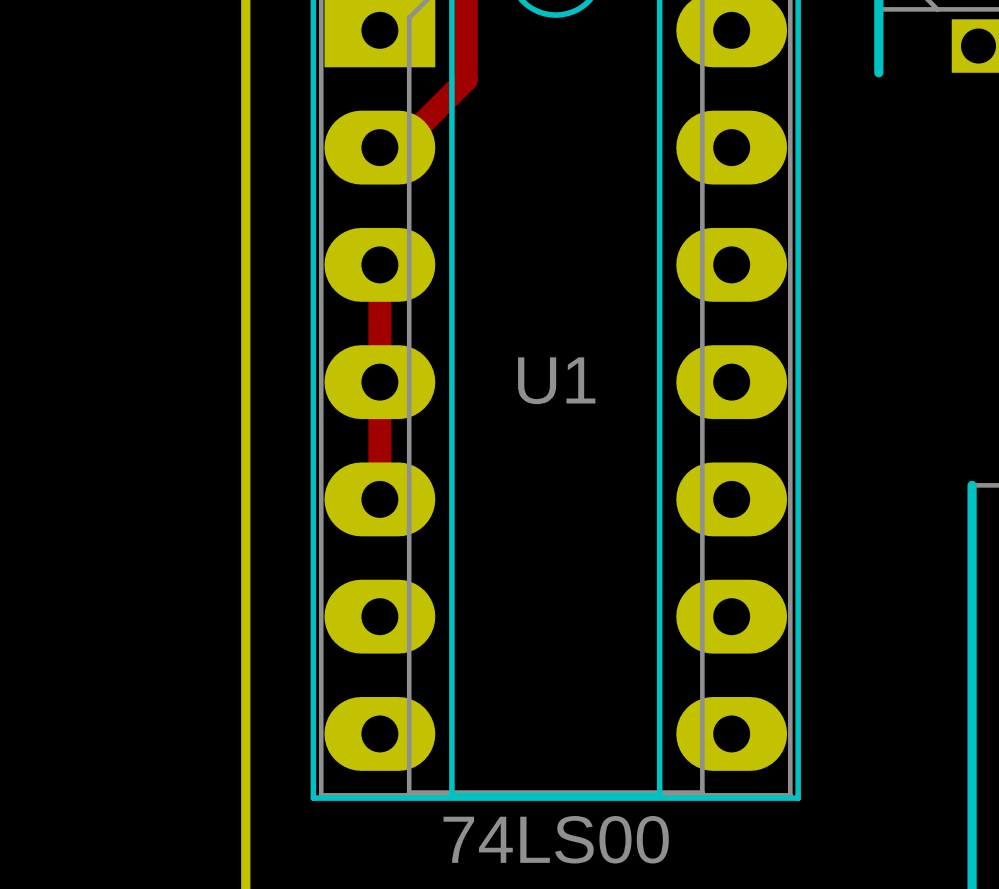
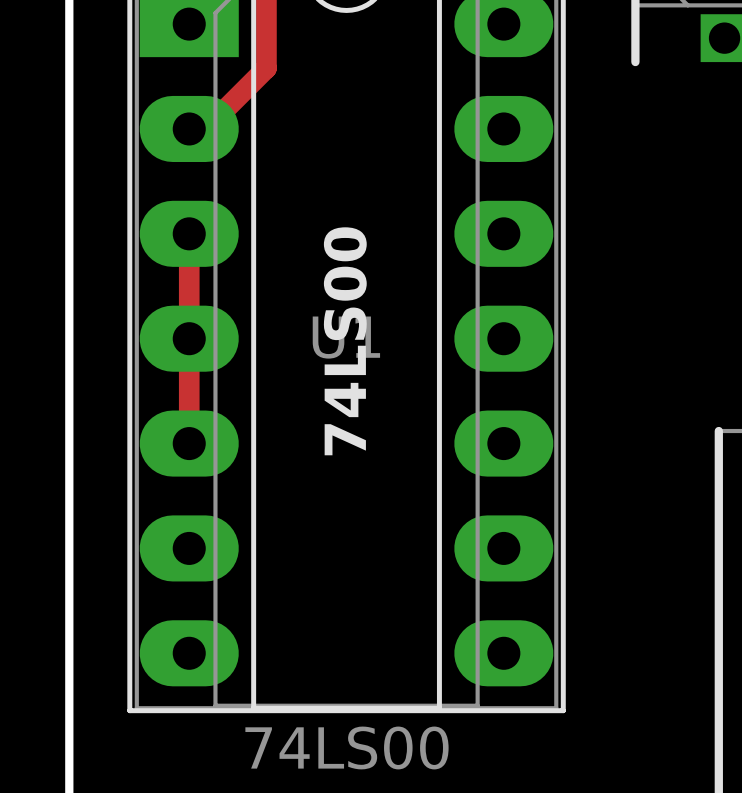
text: none -> 74LS00 (345, 341)

